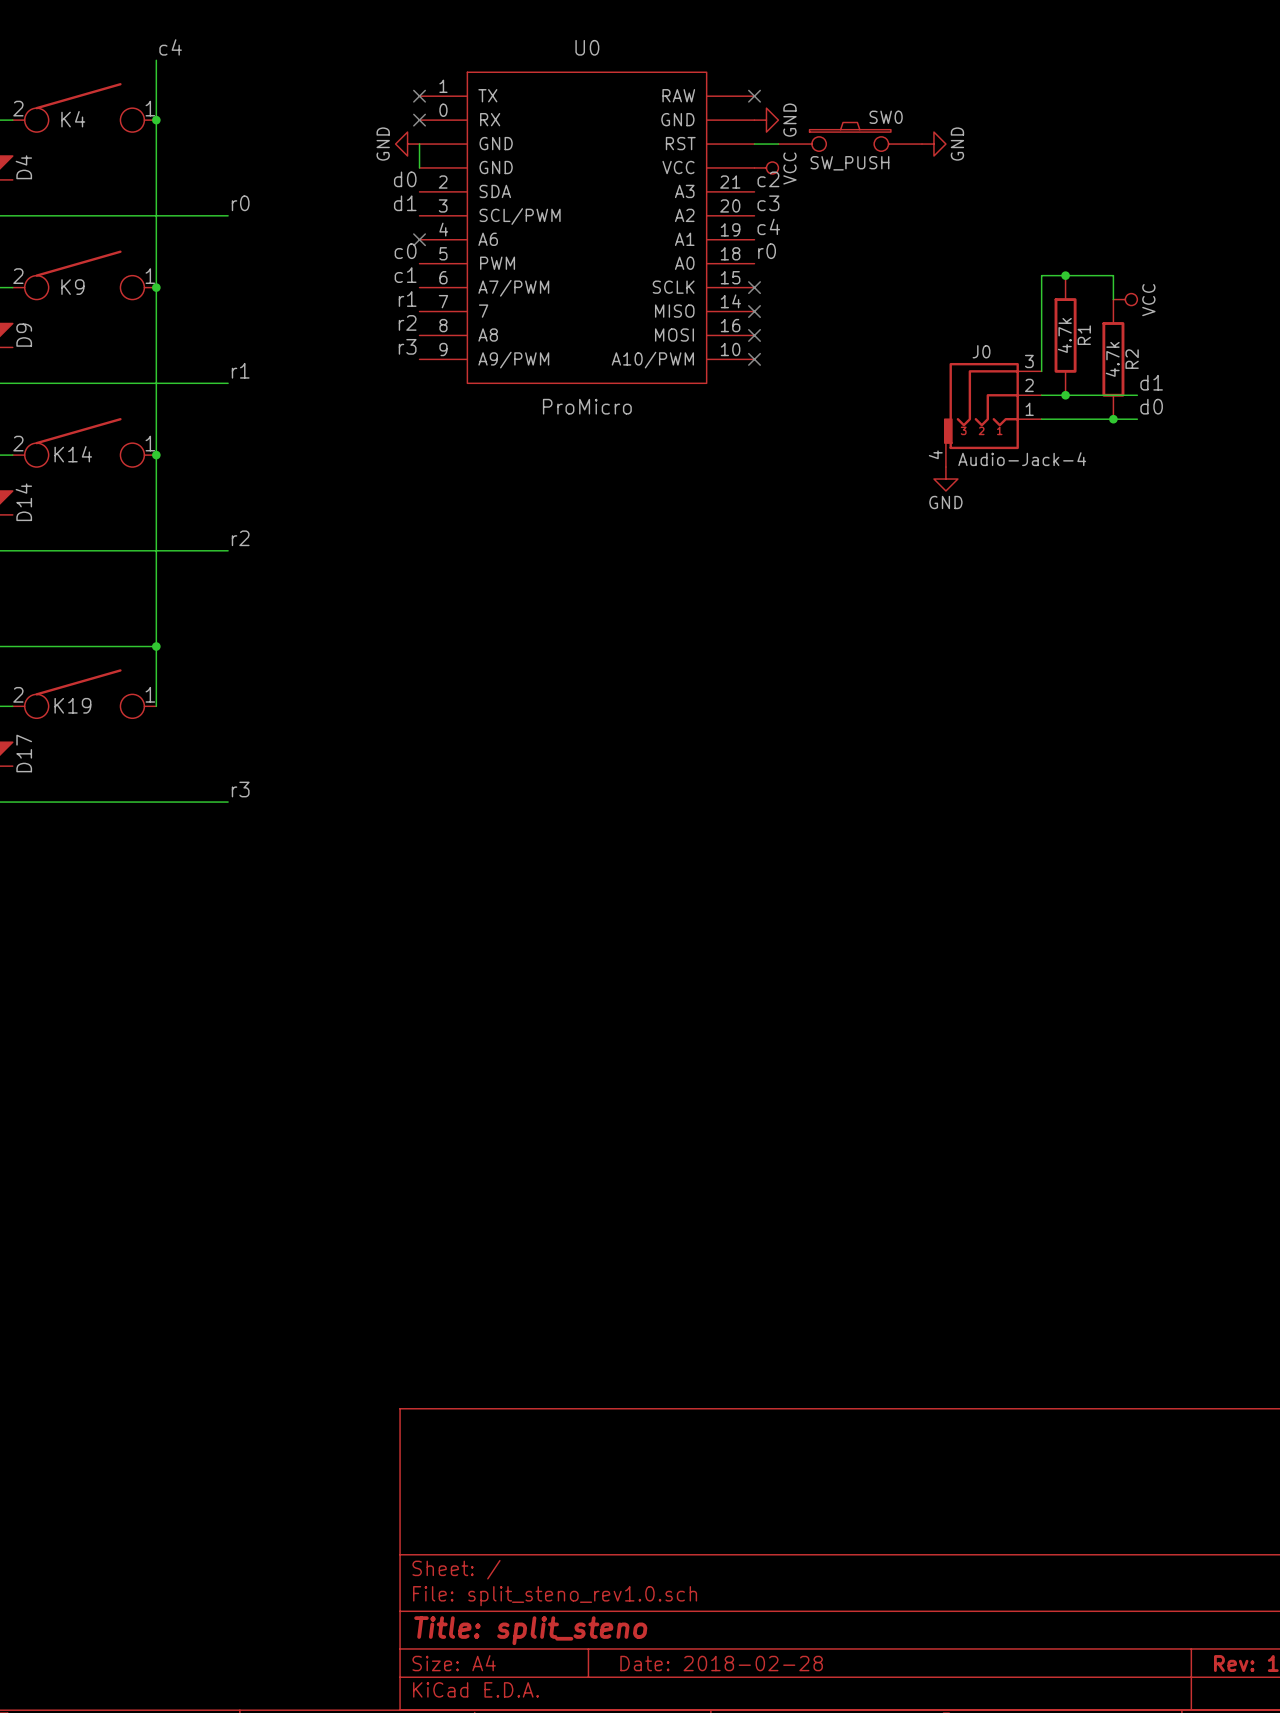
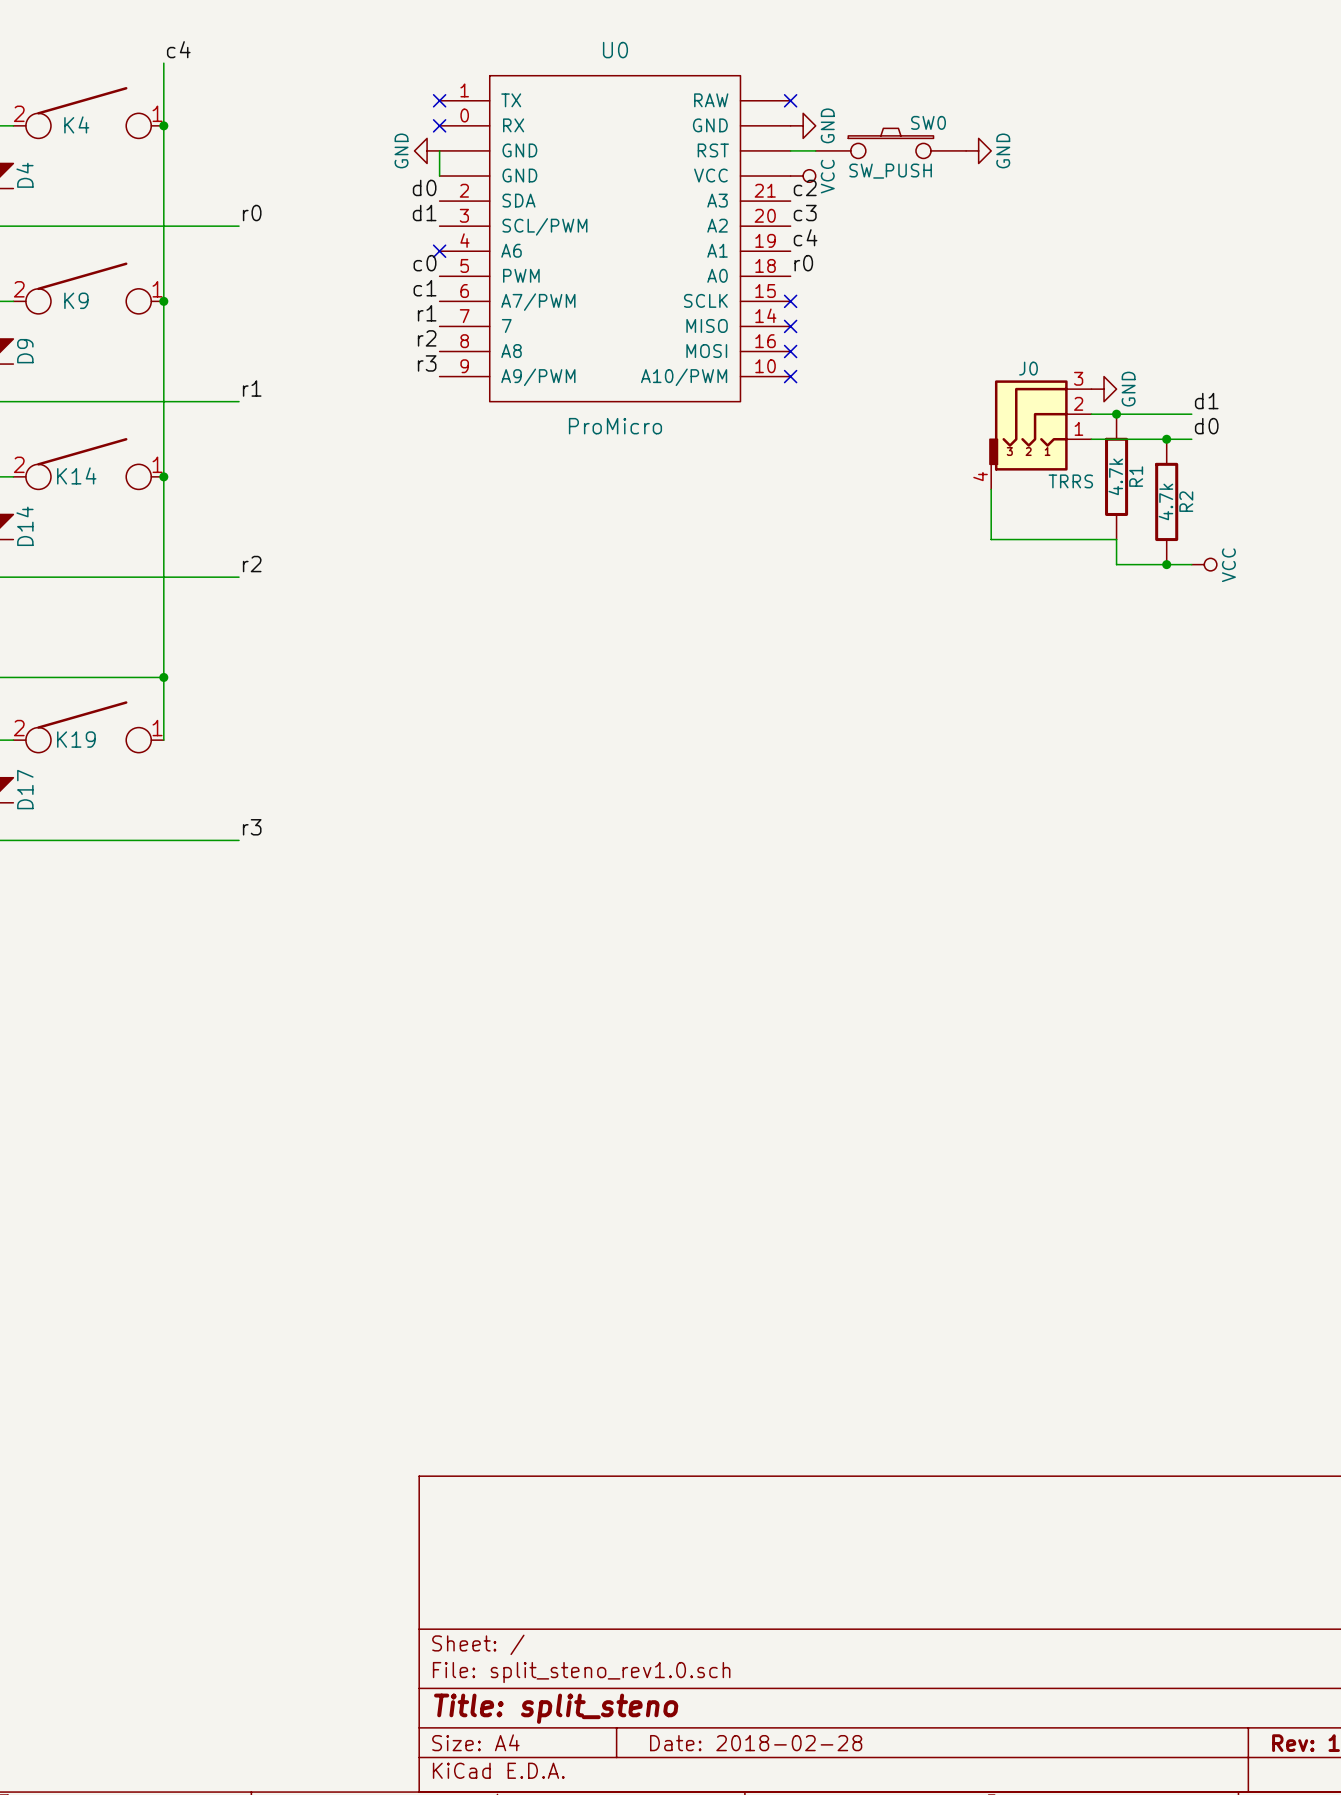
junction: (1065, 275) -> none
wire: (1113, 299) (1113, 275) (1041, 275) (1041, 371) -> none
power symbol: VCC (1125, 299) -> none
R1 position: (1065, 335) -> (1116, 476)
R2 position: (1113, 359) -> (1166, 501)
J0 value: Audio-Jack-4 (1022, 459) -> TRRS (1070, 481)
wire: none -> (991, 489) (991, 539) (1116, 539) (1116, 564) (1191, 564)
power symbol rotation: 0° (945, 479) -> 90° counterclockwise (1104, 389)
power symbol position: GND (945, 479) -> GND (1104, 389)
junction: none -> (1166, 564)
power symbol: none -> VCC (1204, 564)

